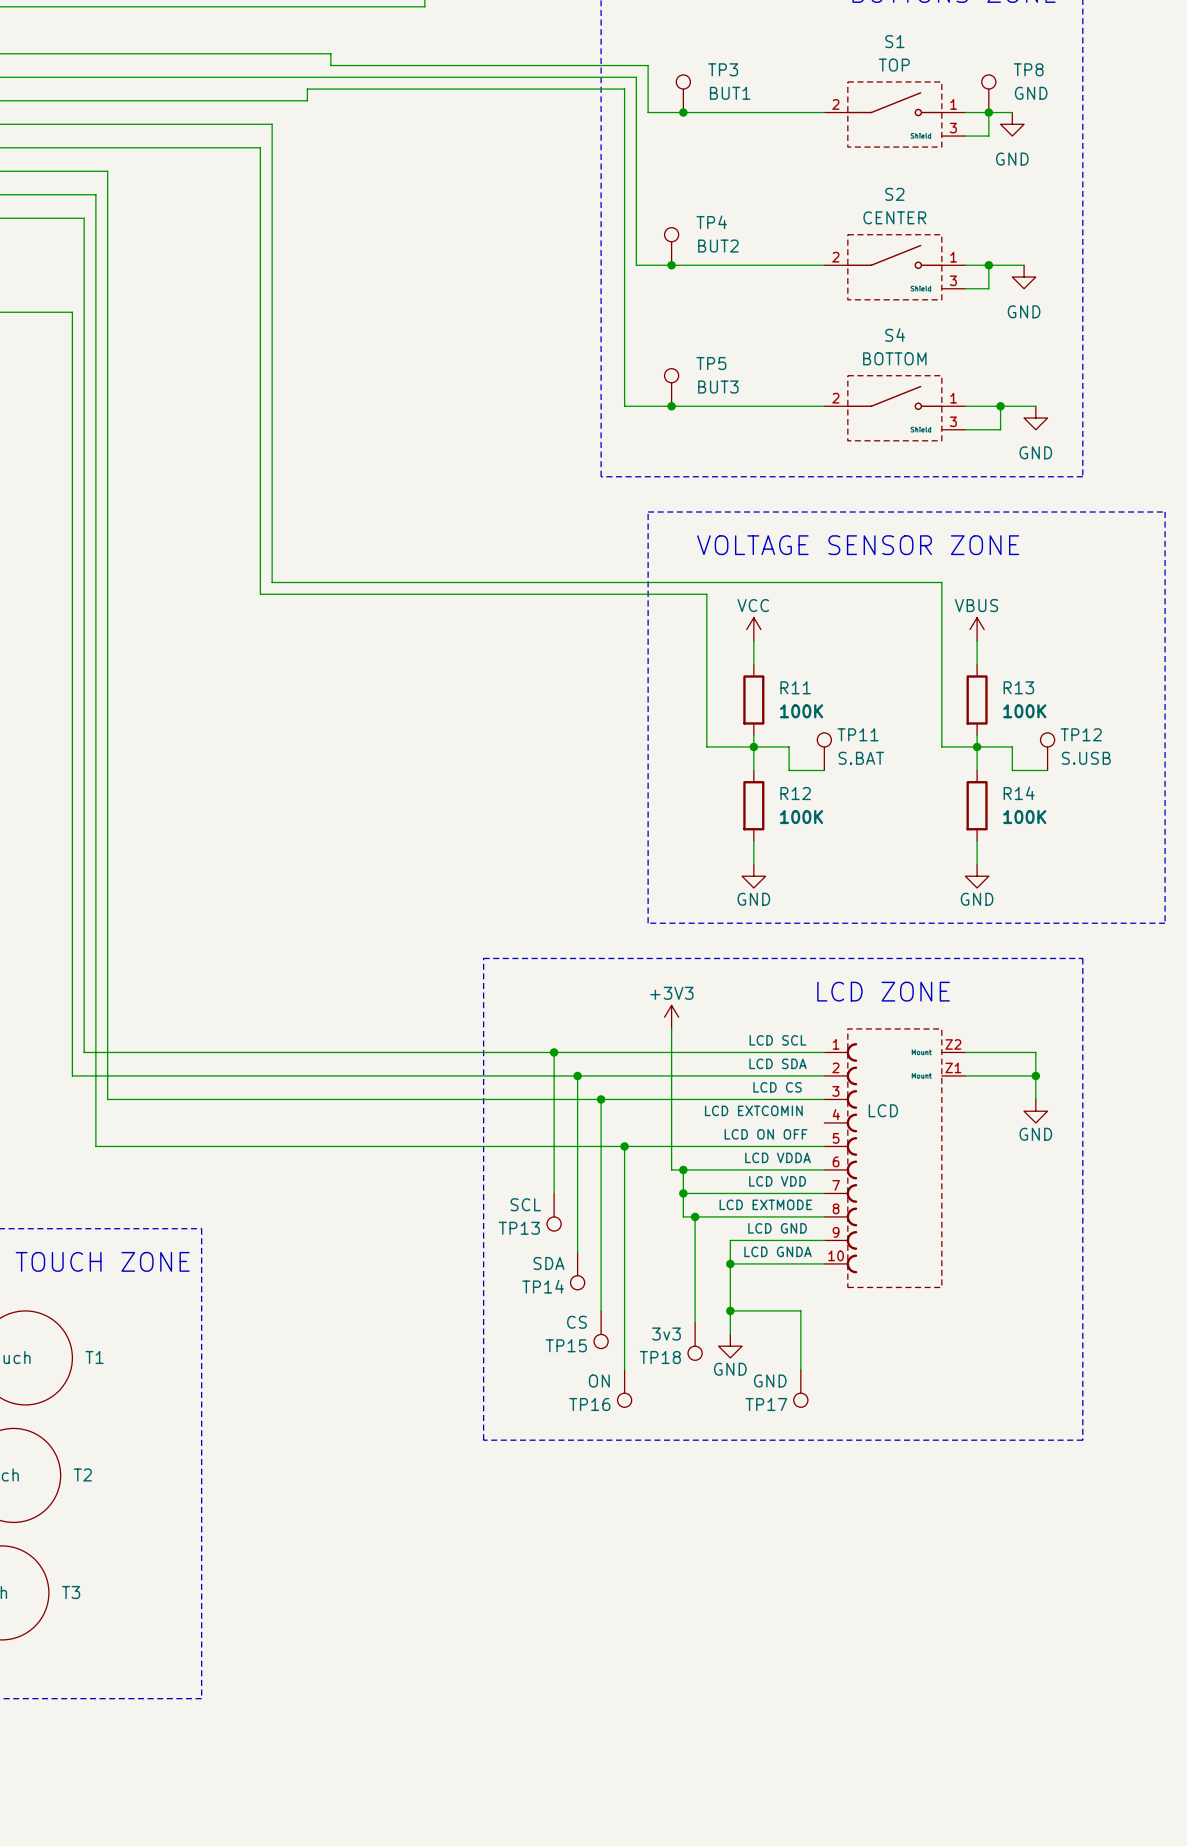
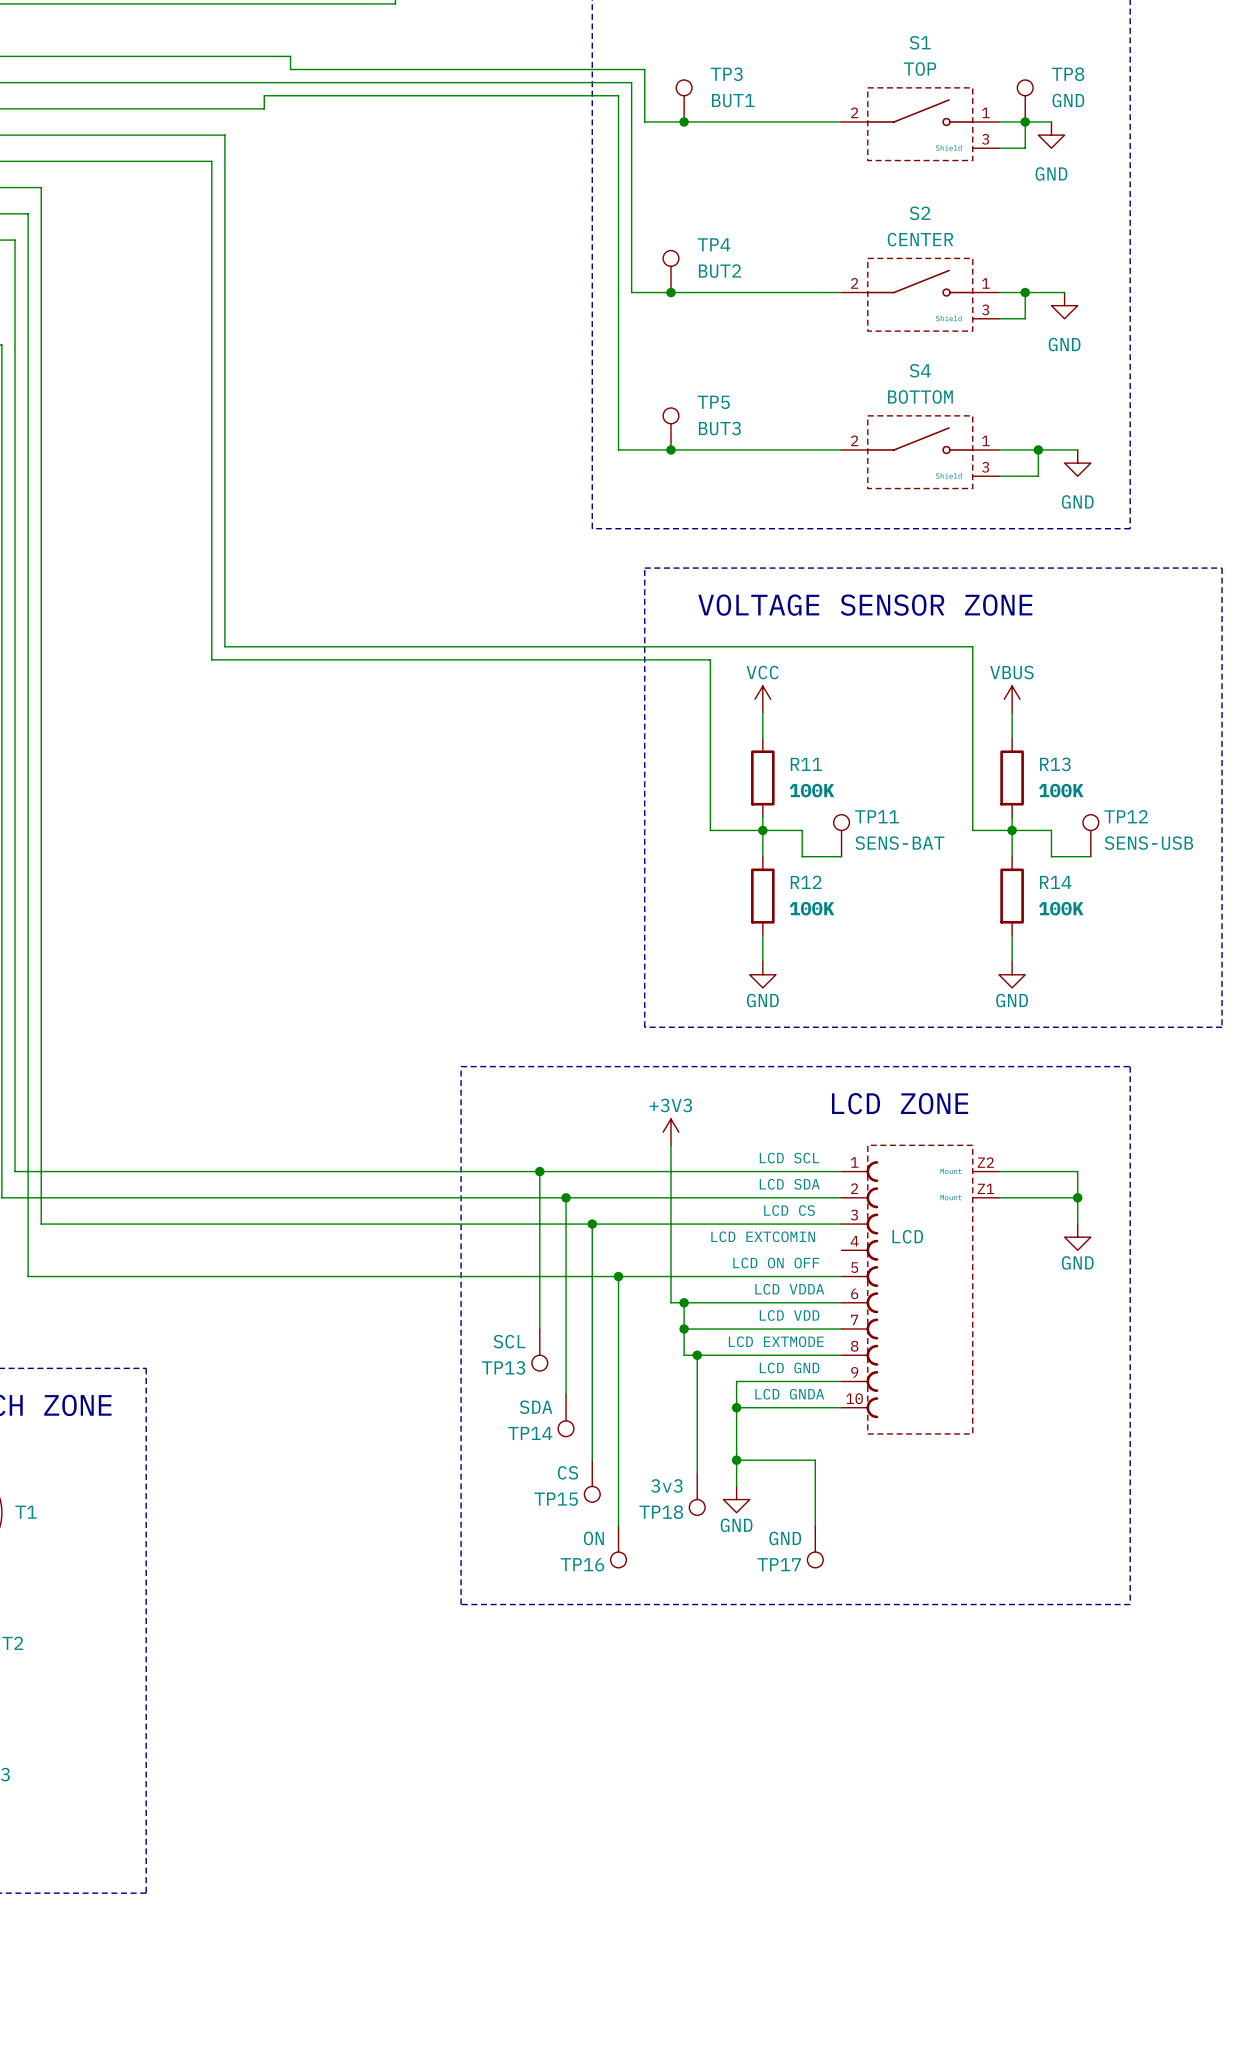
TP11 value: S.BAT (861, 758) -> SENS-BAT (899, 843)
TP12 value: S.USB (1086, 758) -> SENS-USB (1148, 843)

